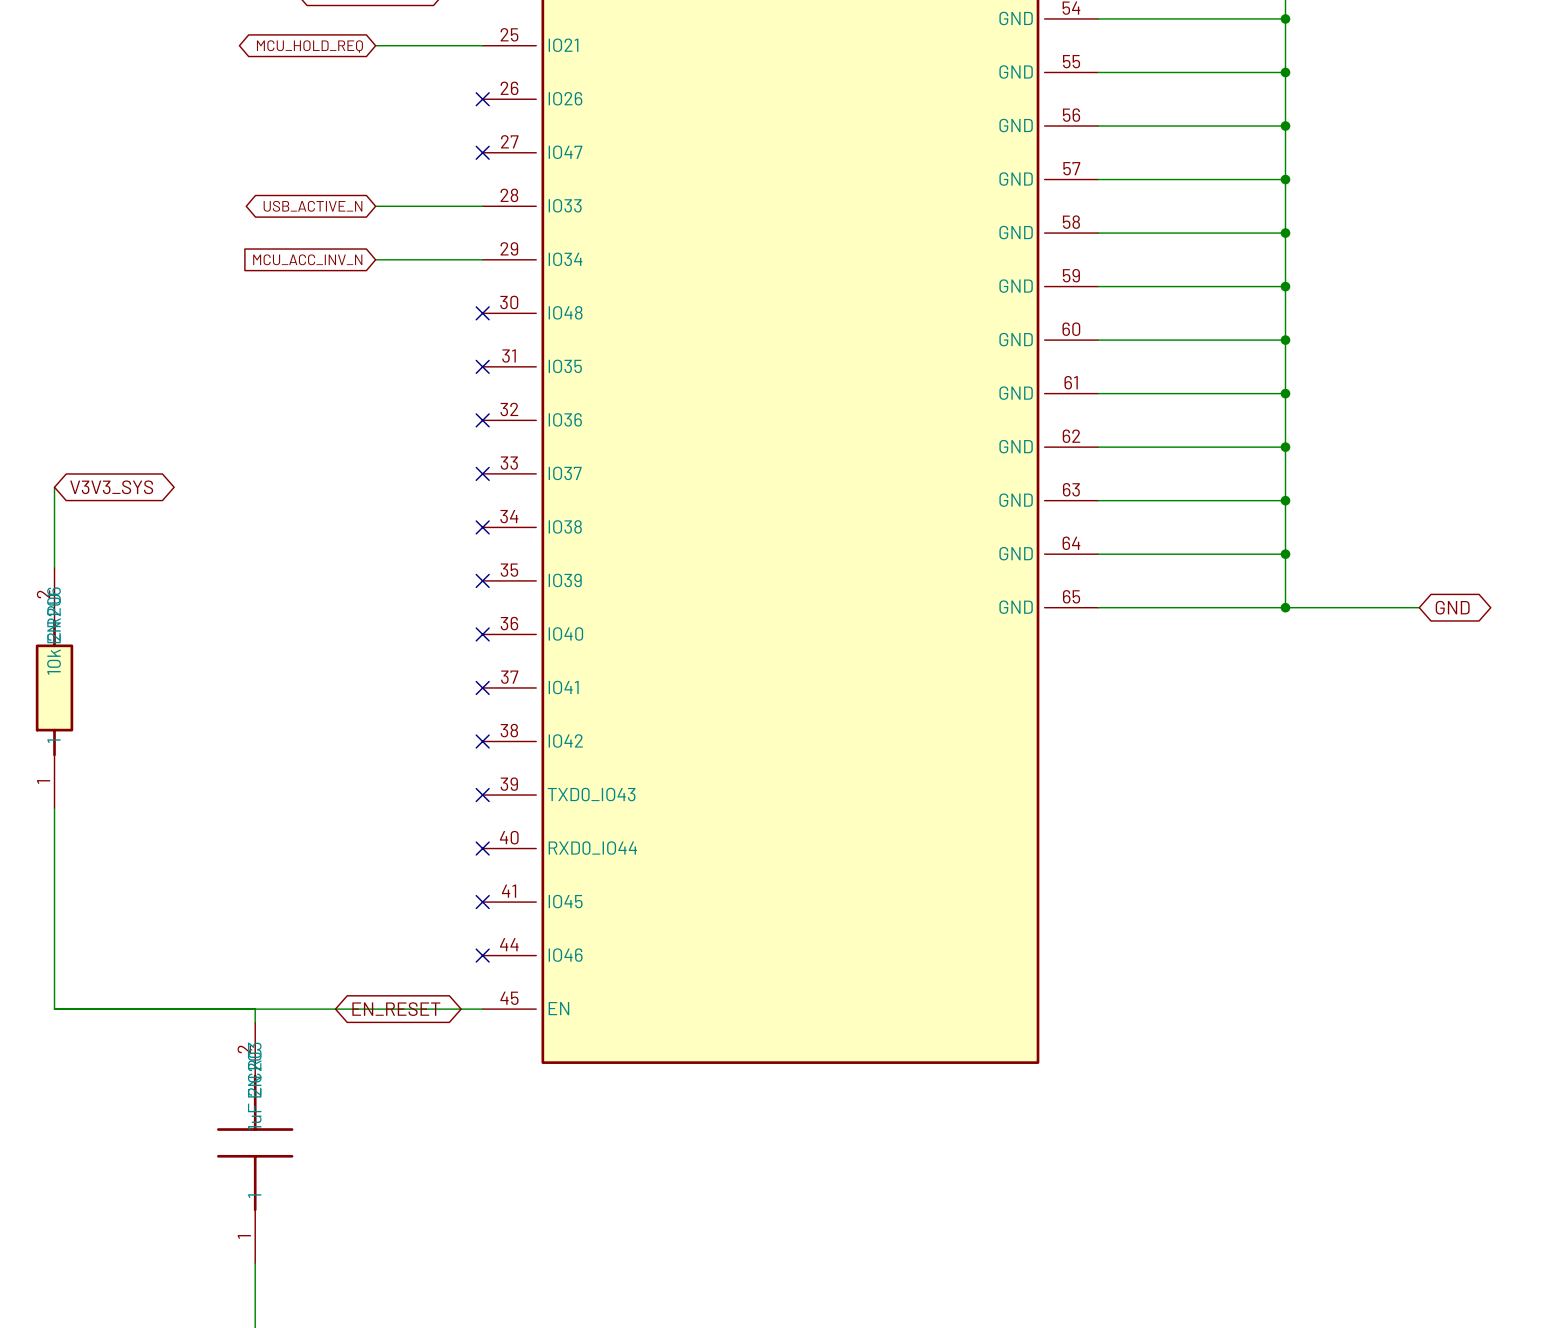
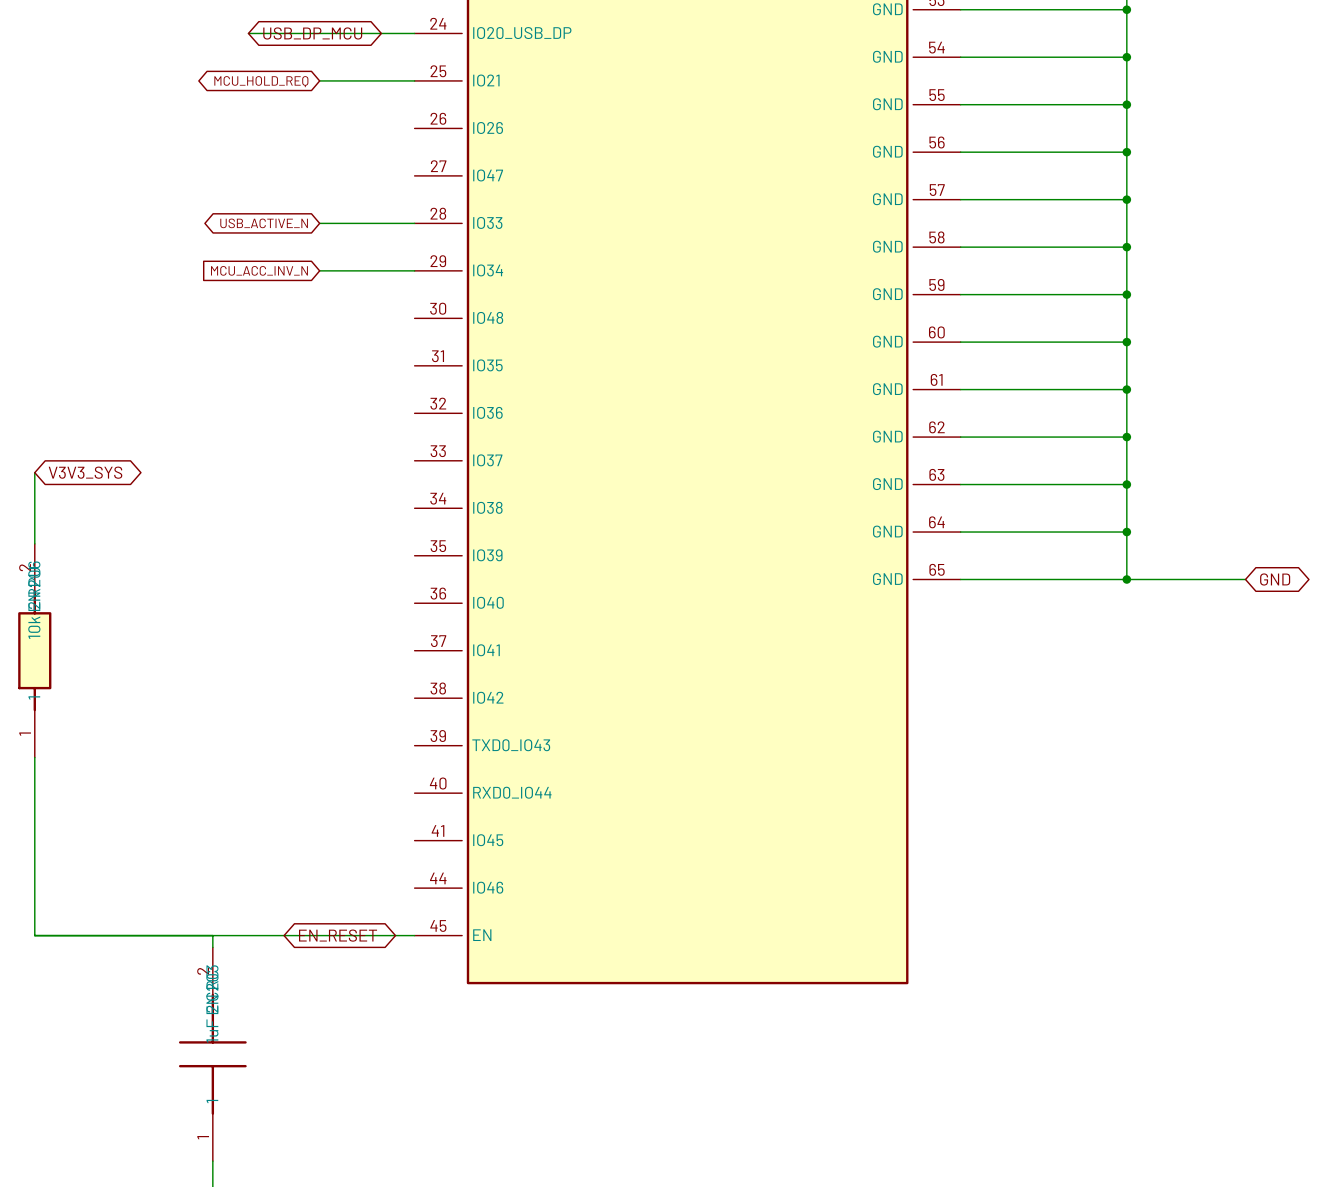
no-connect mark: (482, 99) -> none
no-connect mark: (482, 152) -> none
no-connect mark: (482, 313) -> none
no-connect mark: (482, 366) -> none
no-connect mark: (482, 420) -> none
no-connect mark: (482, 473) -> none
no-connect mark: (482, 527) -> none
no-connect mark: (482, 580) -> none
no-connect mark: (482, 634) -> none
no-connect mark: (482, 687) -> none
no-connect mark: (482, 741) -> none
no-connect mark: (482, 795) -> none
no-connect mark: (482, 848) -> none
no-connect mark: (482, 902) -> none
no-connect mark: (482, 955) -> none

